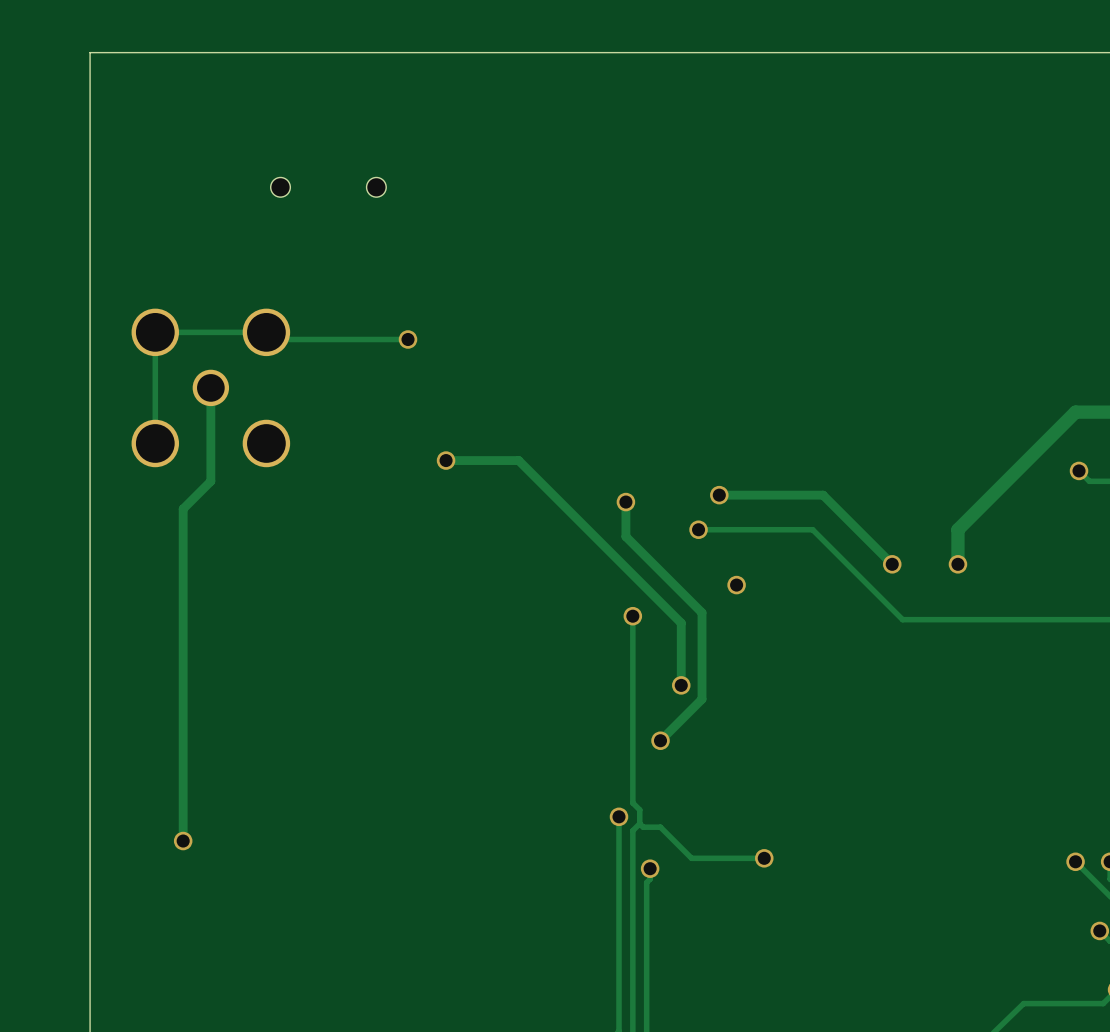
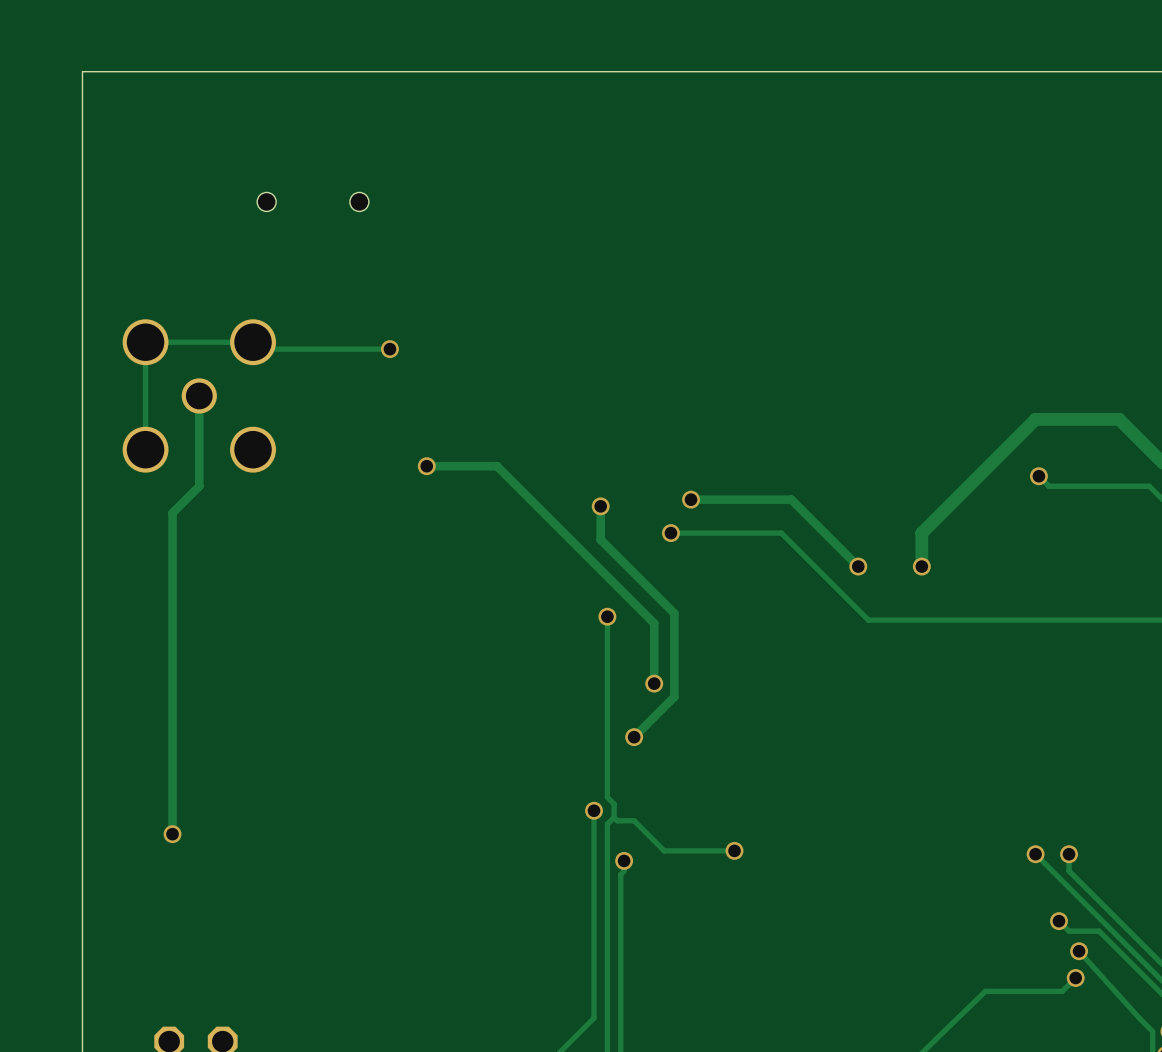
via: (736, 585) -> none

